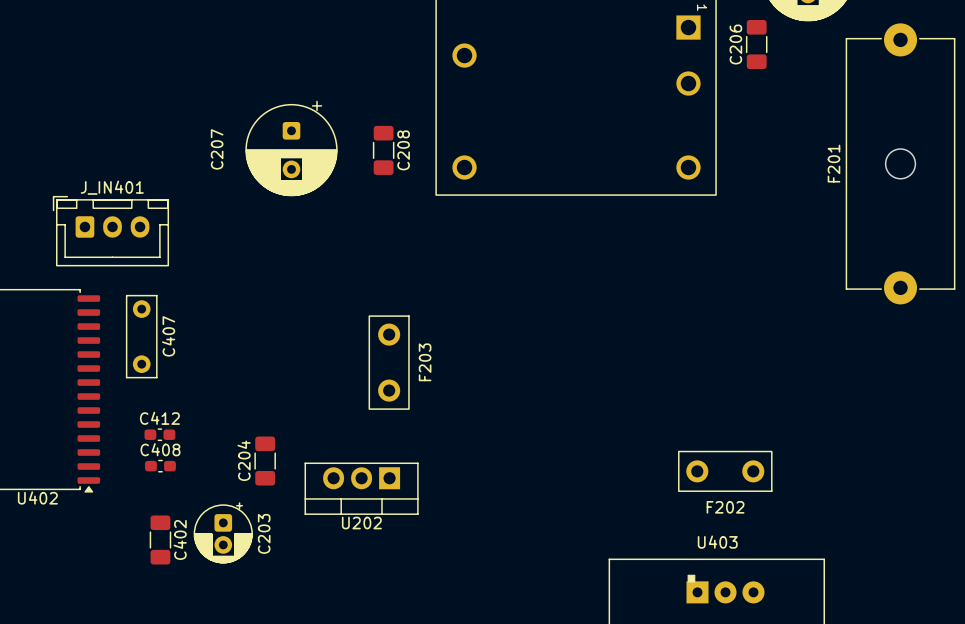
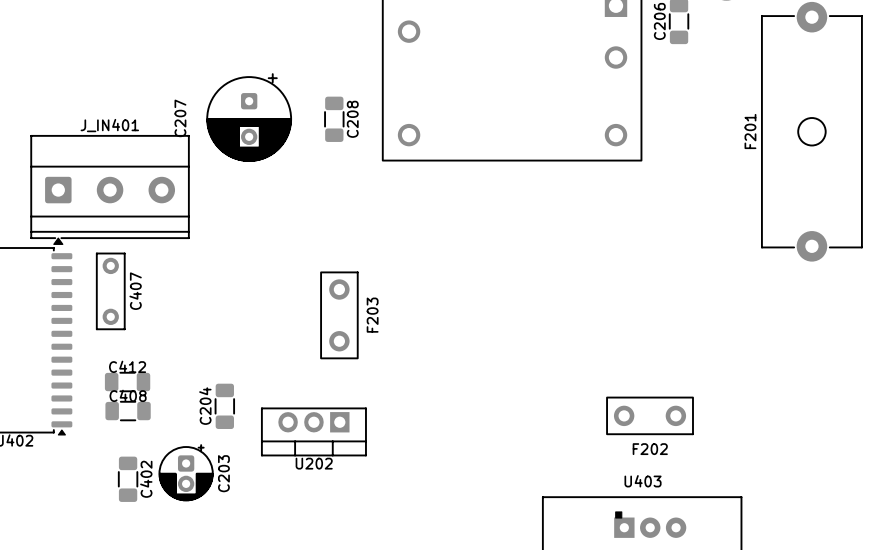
J_IN401 name position: J_IN401 (112, 187) -> J_IN401 (109, 125)
J_IN401 footprint: [52, 196, 169, 267] -> [30, 135, 190, 245]
C412 footprint: [144, 428, 176, 442] -> [104, 372, 151, 392]
C408 footprint: [145, 459, 176, 473] -> [105, 401, 151, 421]

